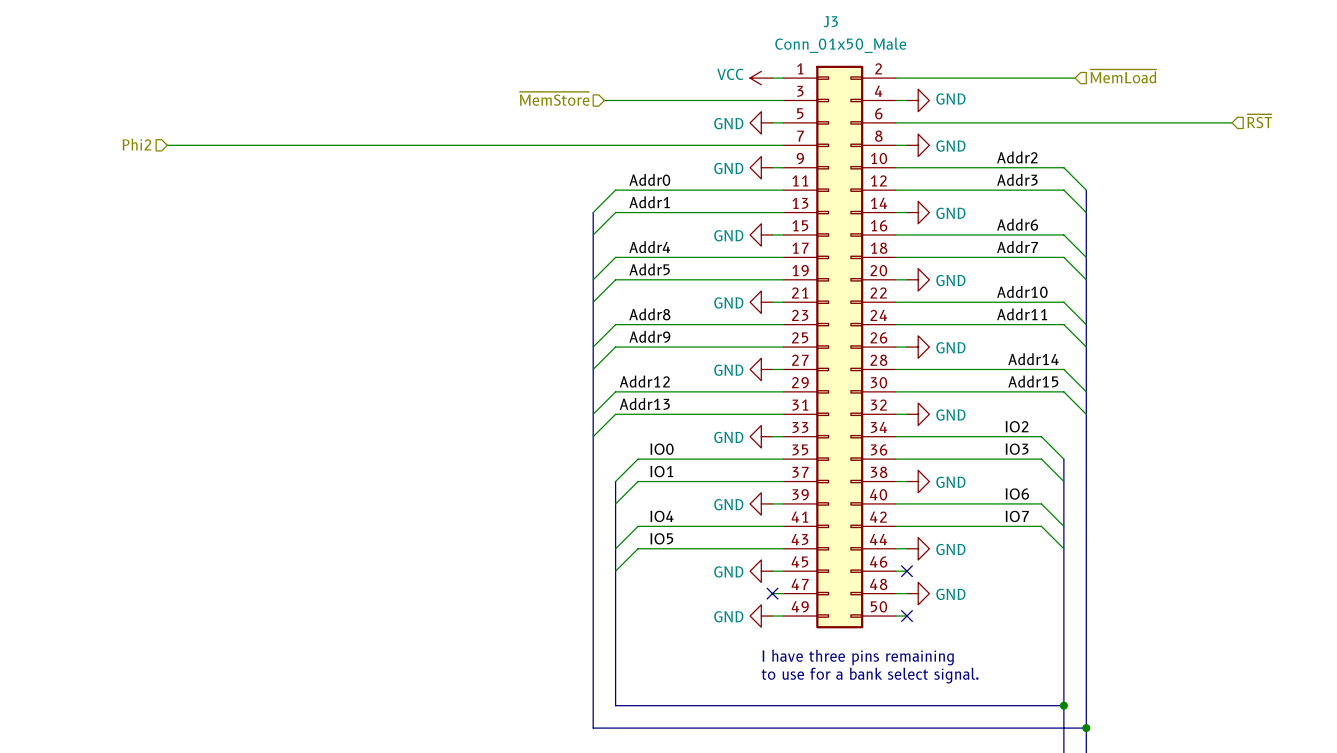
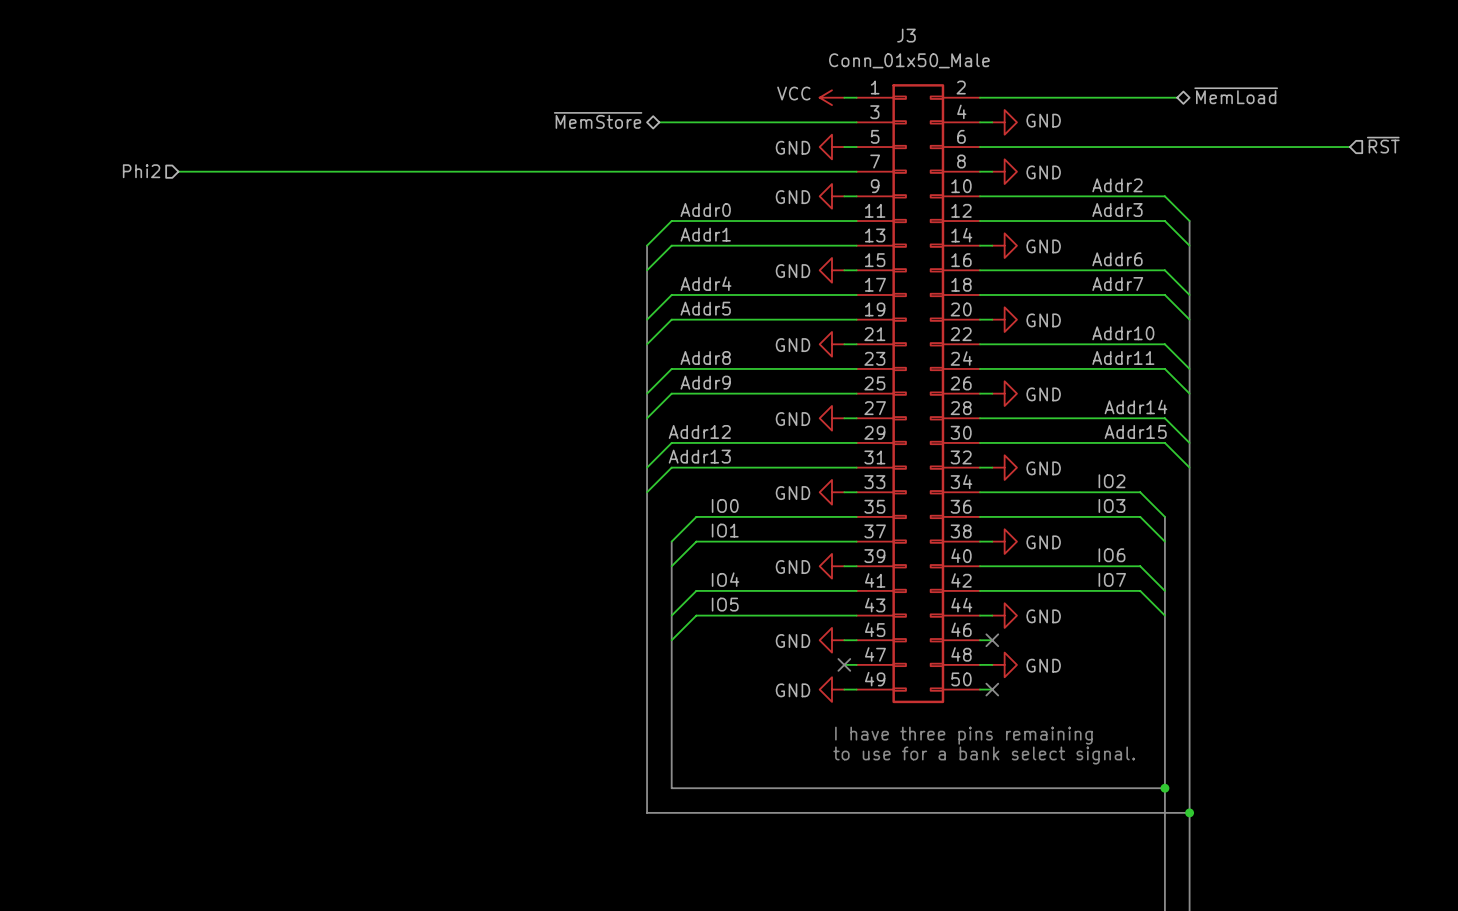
hierarchical label shape: input (1123, 76) -> bidirectional (1236, 95)
hierarchical label shape: input (554, 98) -> bidirectional (598, 120)

